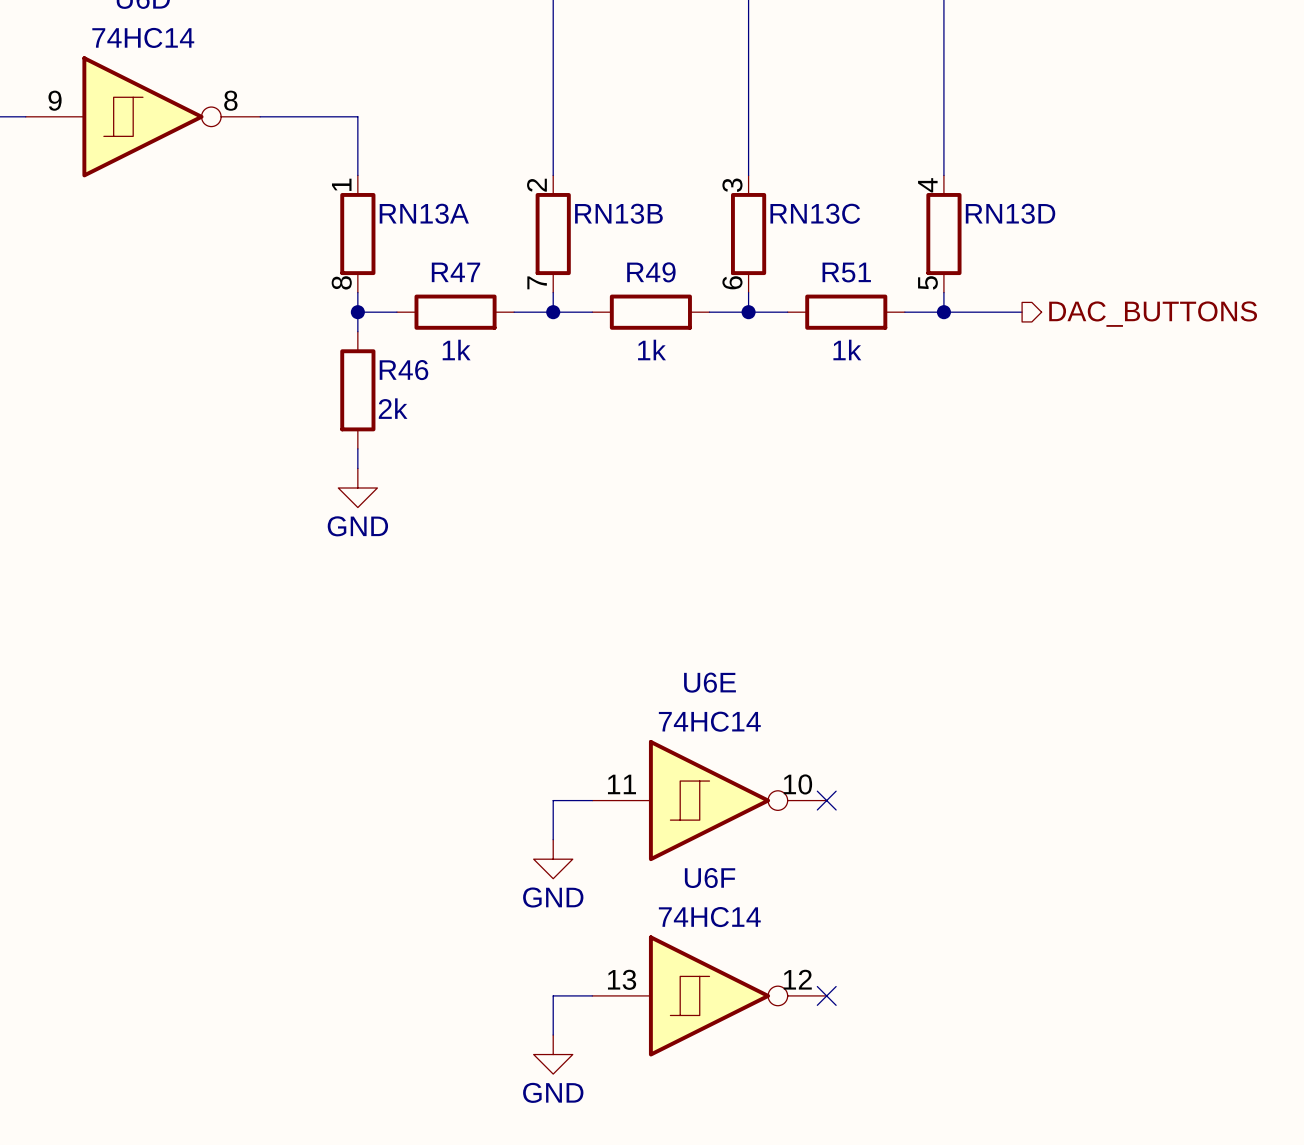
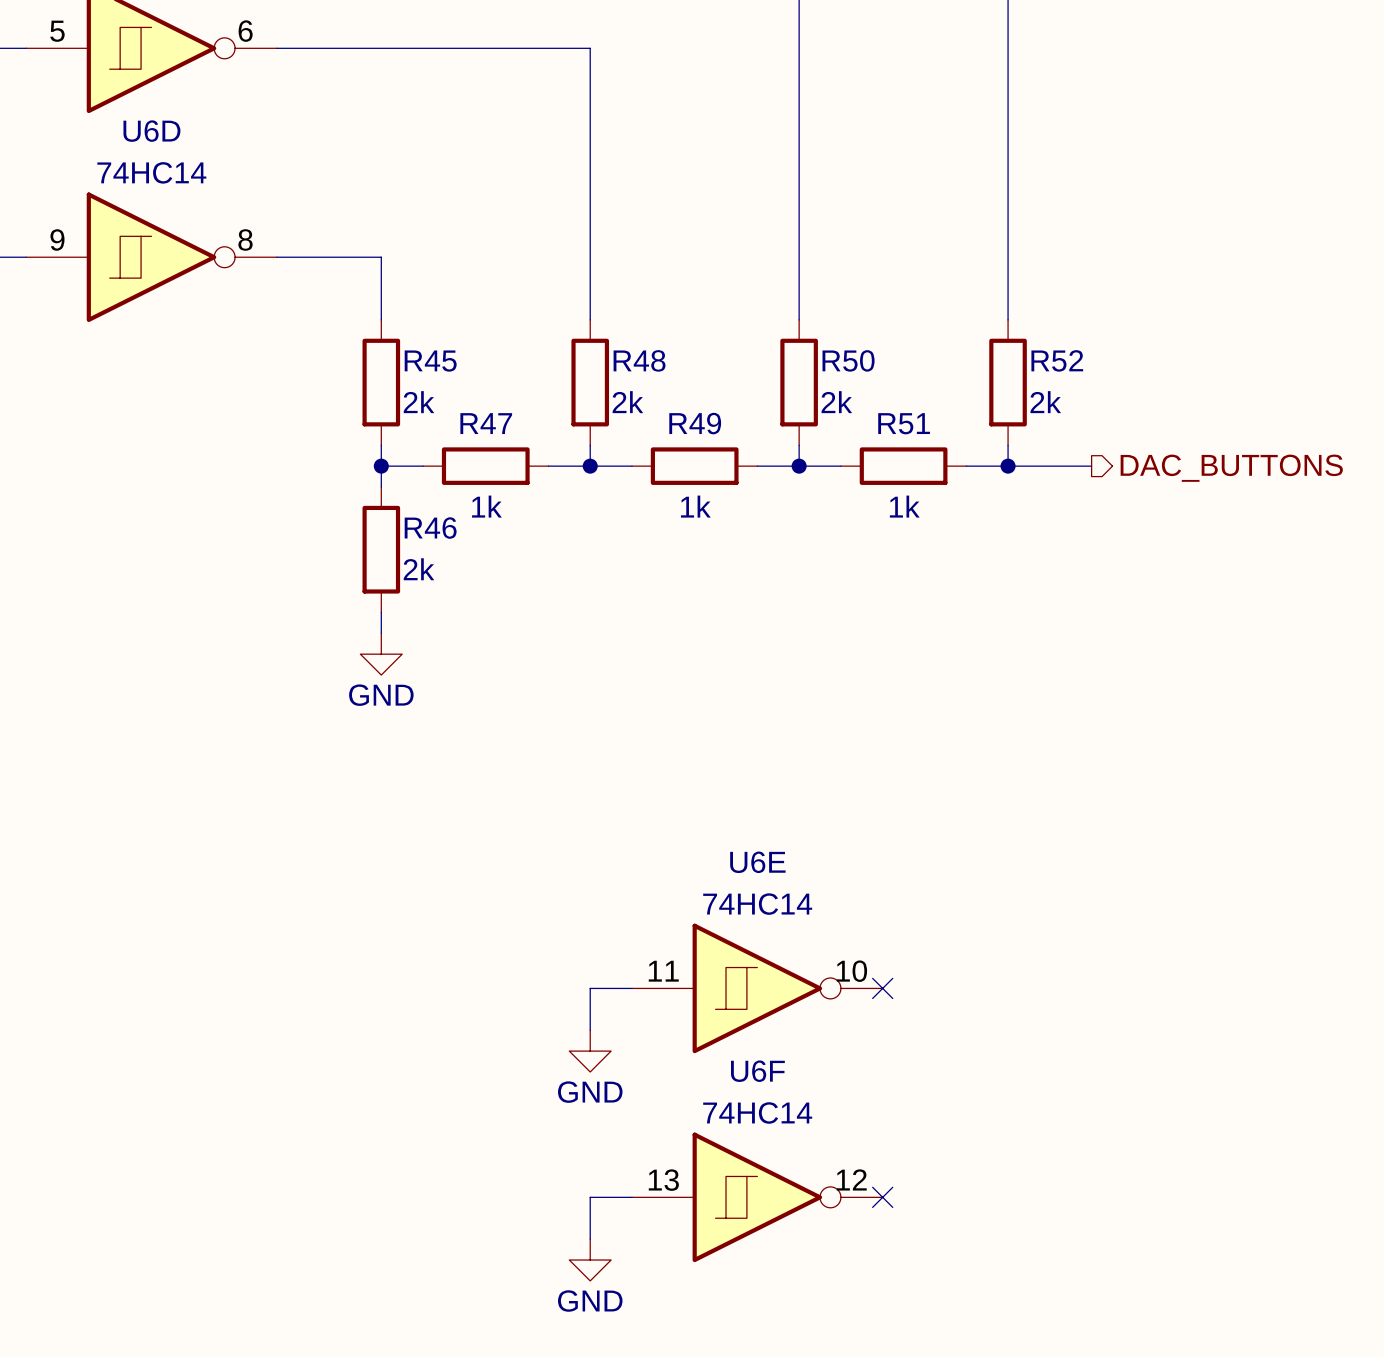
RN13A pin number: 1 (341, 184) -> none
RN13B pin number: 2 (536, 185) -> none
RN13C pin number: 3 (732, 185) -> none
RN13D pin number: 4 (927, 185) -> none
RN13A name: RN13A (424, 213) -> R45 (430, 361)
RN13B name: RN13B (618, 213) -> R48 (639, 360)
RN13C name: RN13C (815, 213) -> R50 (848, 360)
RN13D name: RN13D (1010, 213) -> R52 (1057, 360)
RN13A value: none -> 2k (419, 402)
RN13B value: none -> 2k (627, 402)
RN13C value: none -> 2k (836, 402)
RN13D value: none -> 2k (1045, 402)
RN13A pin number: 8 (341, 282) -> none
RN13B pin number: 7 (537, 282) -> none
RN13C pin number: 6 (732, 282) -> none
RN13D pin number: 5 (927, 282) -> none

